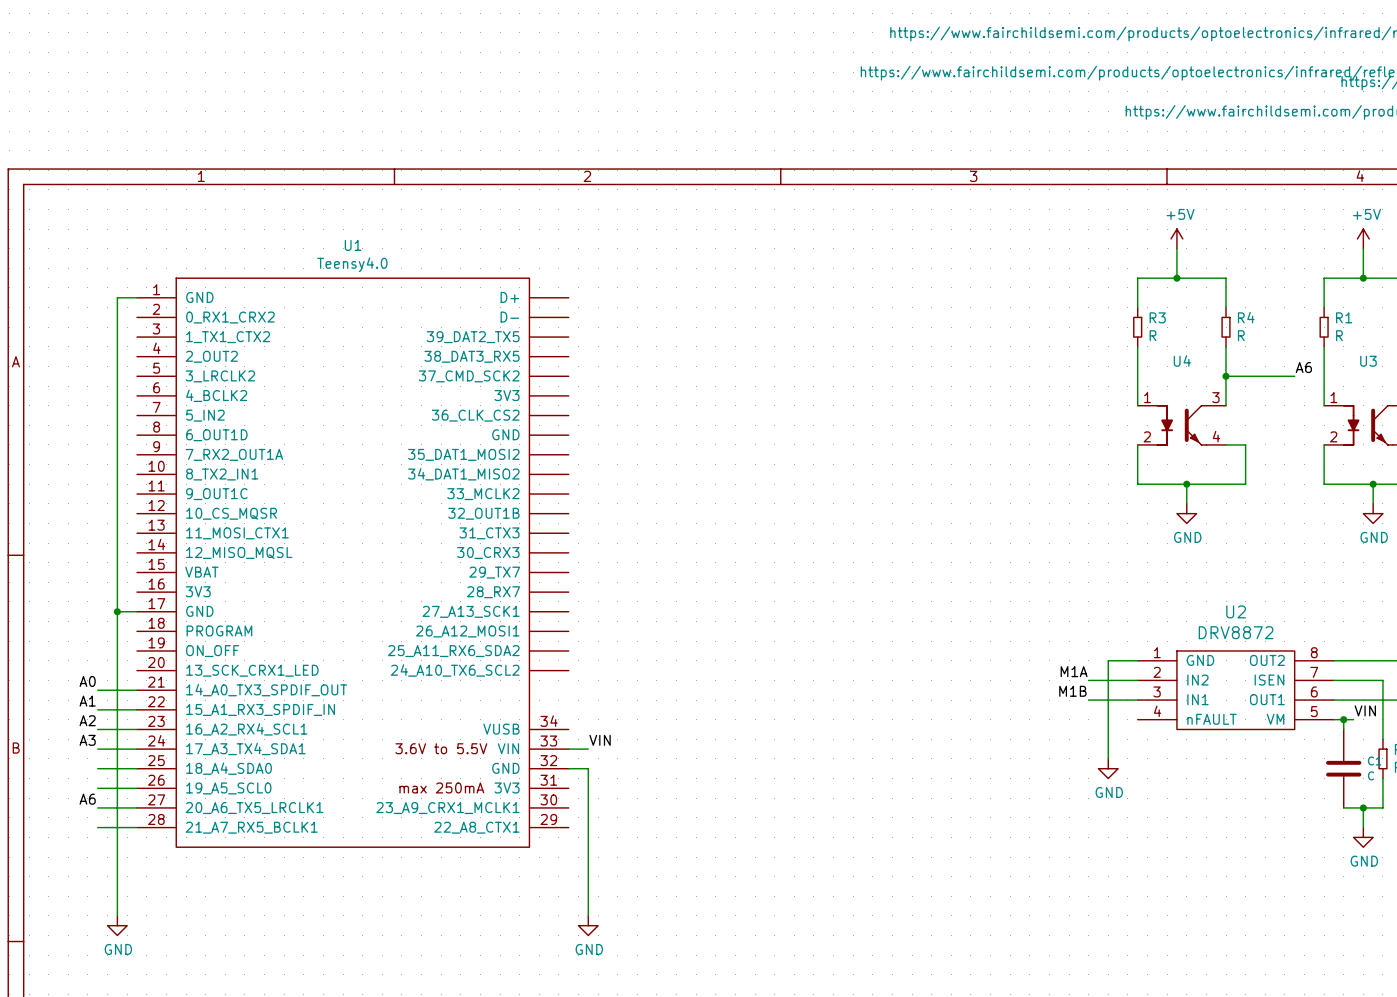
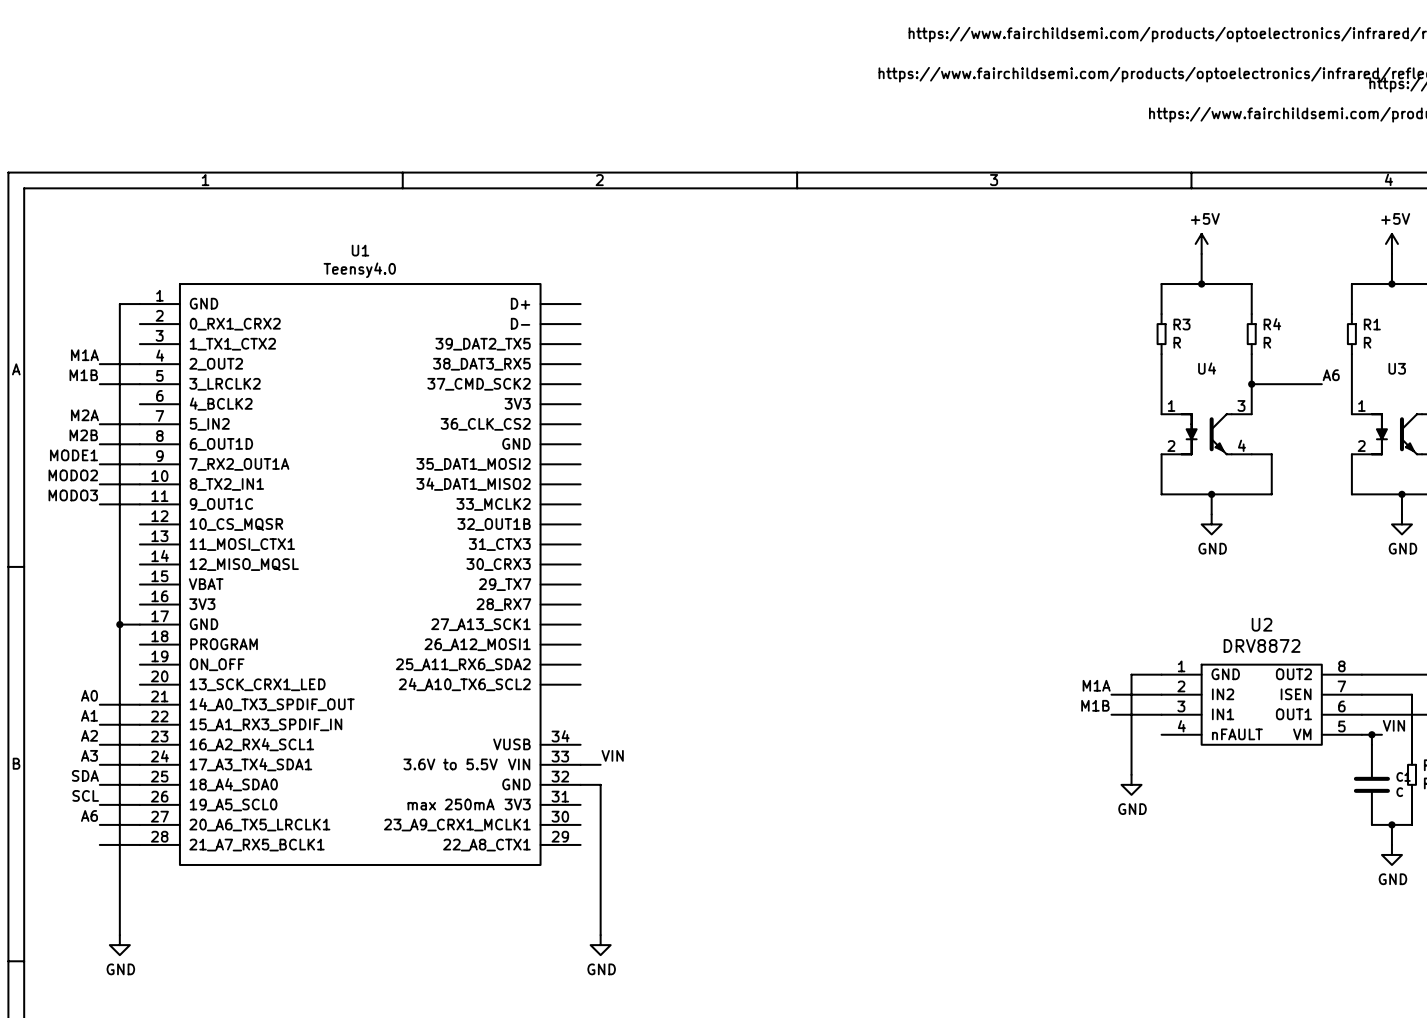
label: none -> M1A (84, 355)
wire: none -> (99, 364) (139, 364)
label: none -> M1B (83, 375)
wire: none -> (99, 384) (139, 384)
label: none -> M2A (84, 415)
wire: none -> (99, 424) (139, 424)
label: none -> M2B (83, 435)
wire: none -> (99, 444) (139, 444)
label: none -> MODE1 (73, 455)
wire: none -> (99, 464) (139, 464)
label: none -> MODO2 (73, 475)
wire: none -> (99, 484) (139, 484)
label: none -> MODO3 (73, 495)
wire: none -> (99, 504) (139, 504)
label: none -> SDA (85, 775)
label: none -> SCL (85, 795)

